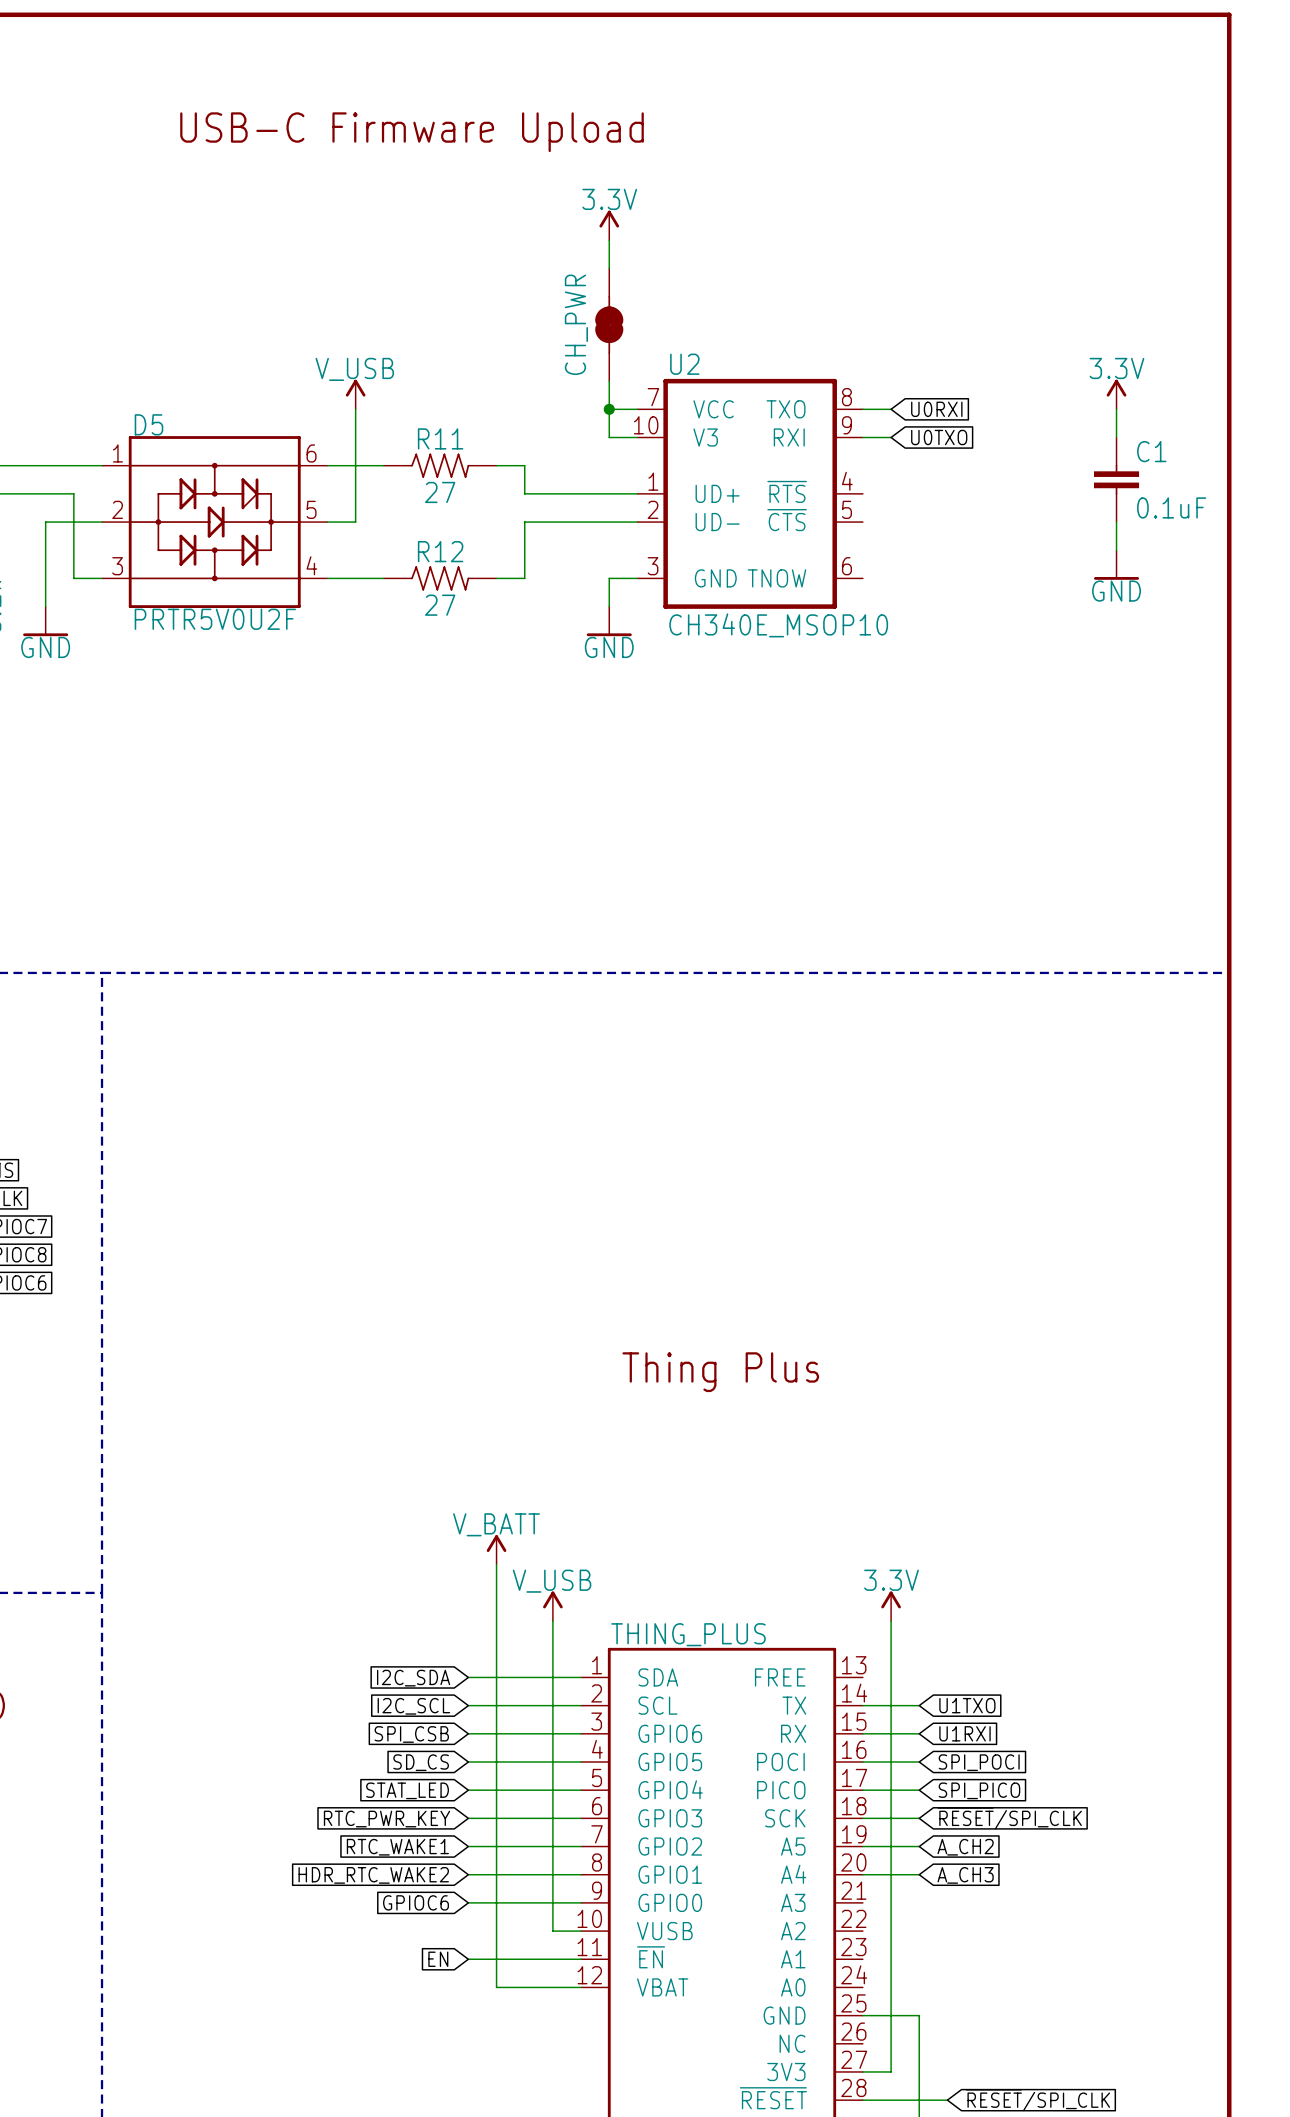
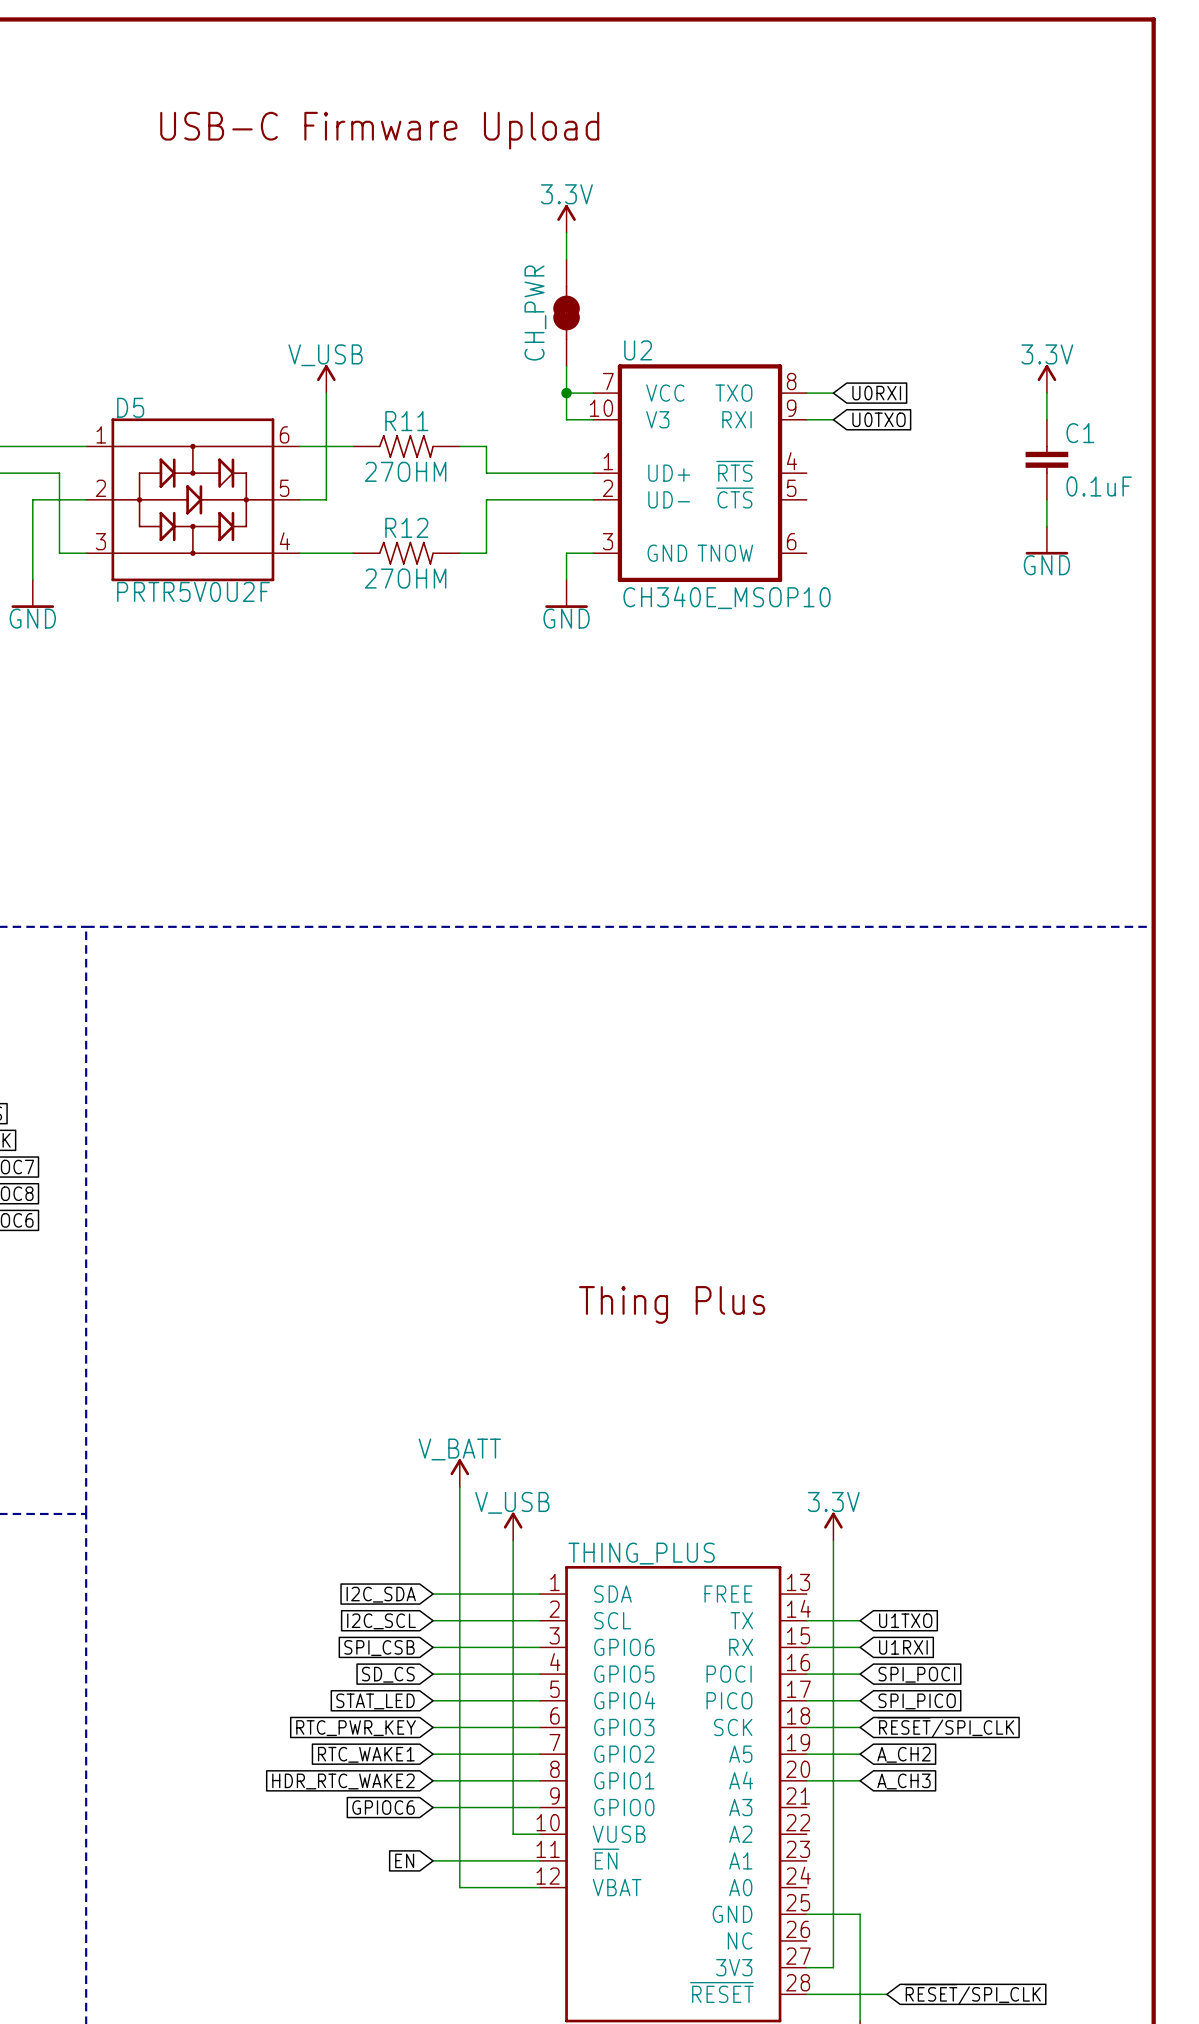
R11 value: 27 (440, 492) -> 27OHM (405, 471)
R12 value: 27 (440, 605) -> 27OHM (405, 578)

